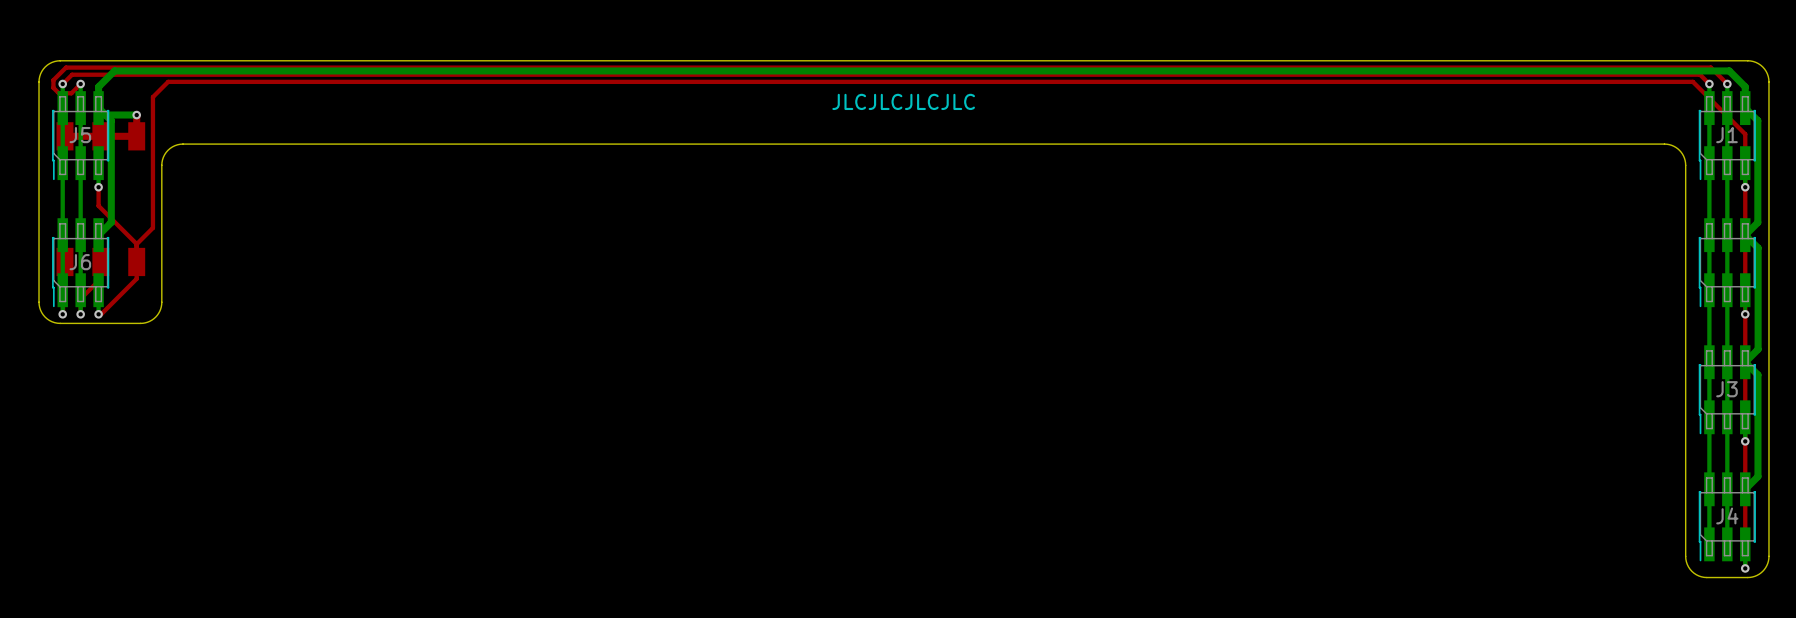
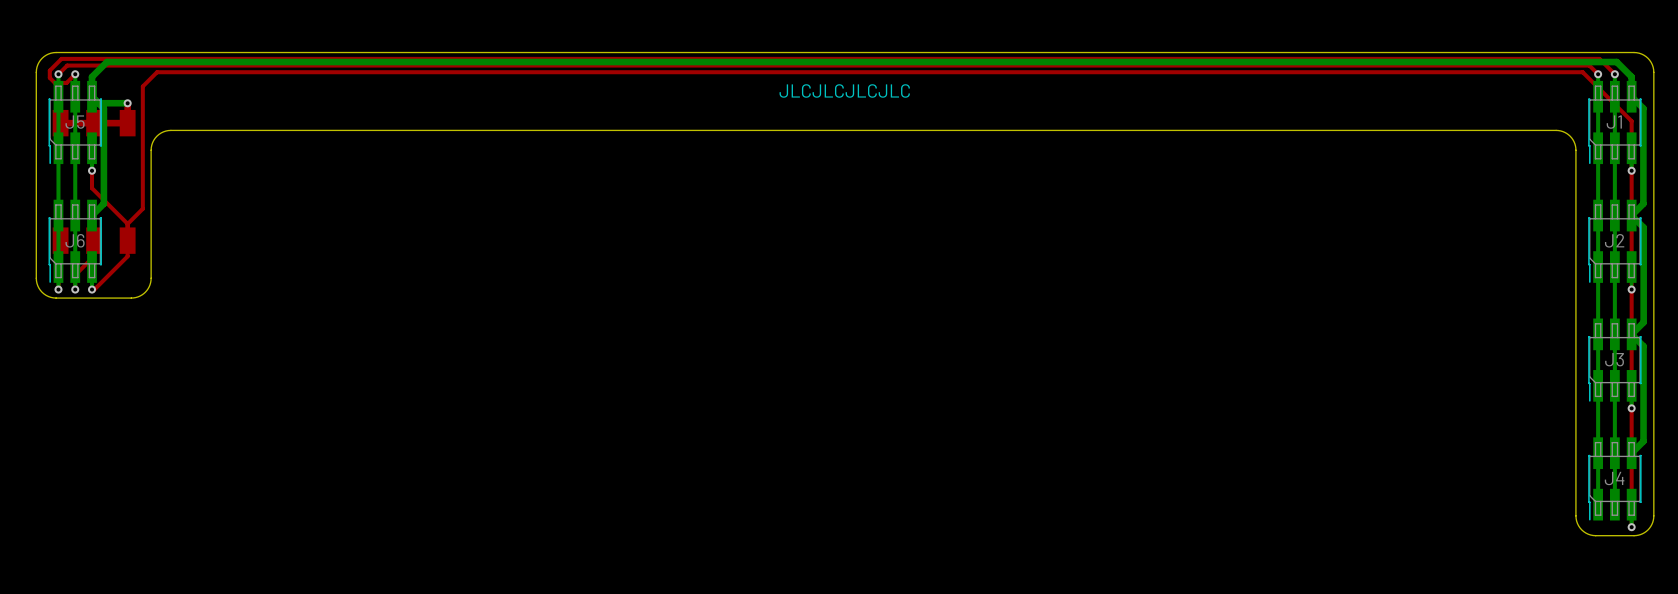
J2 name: none -> J2 (1614, 240)

